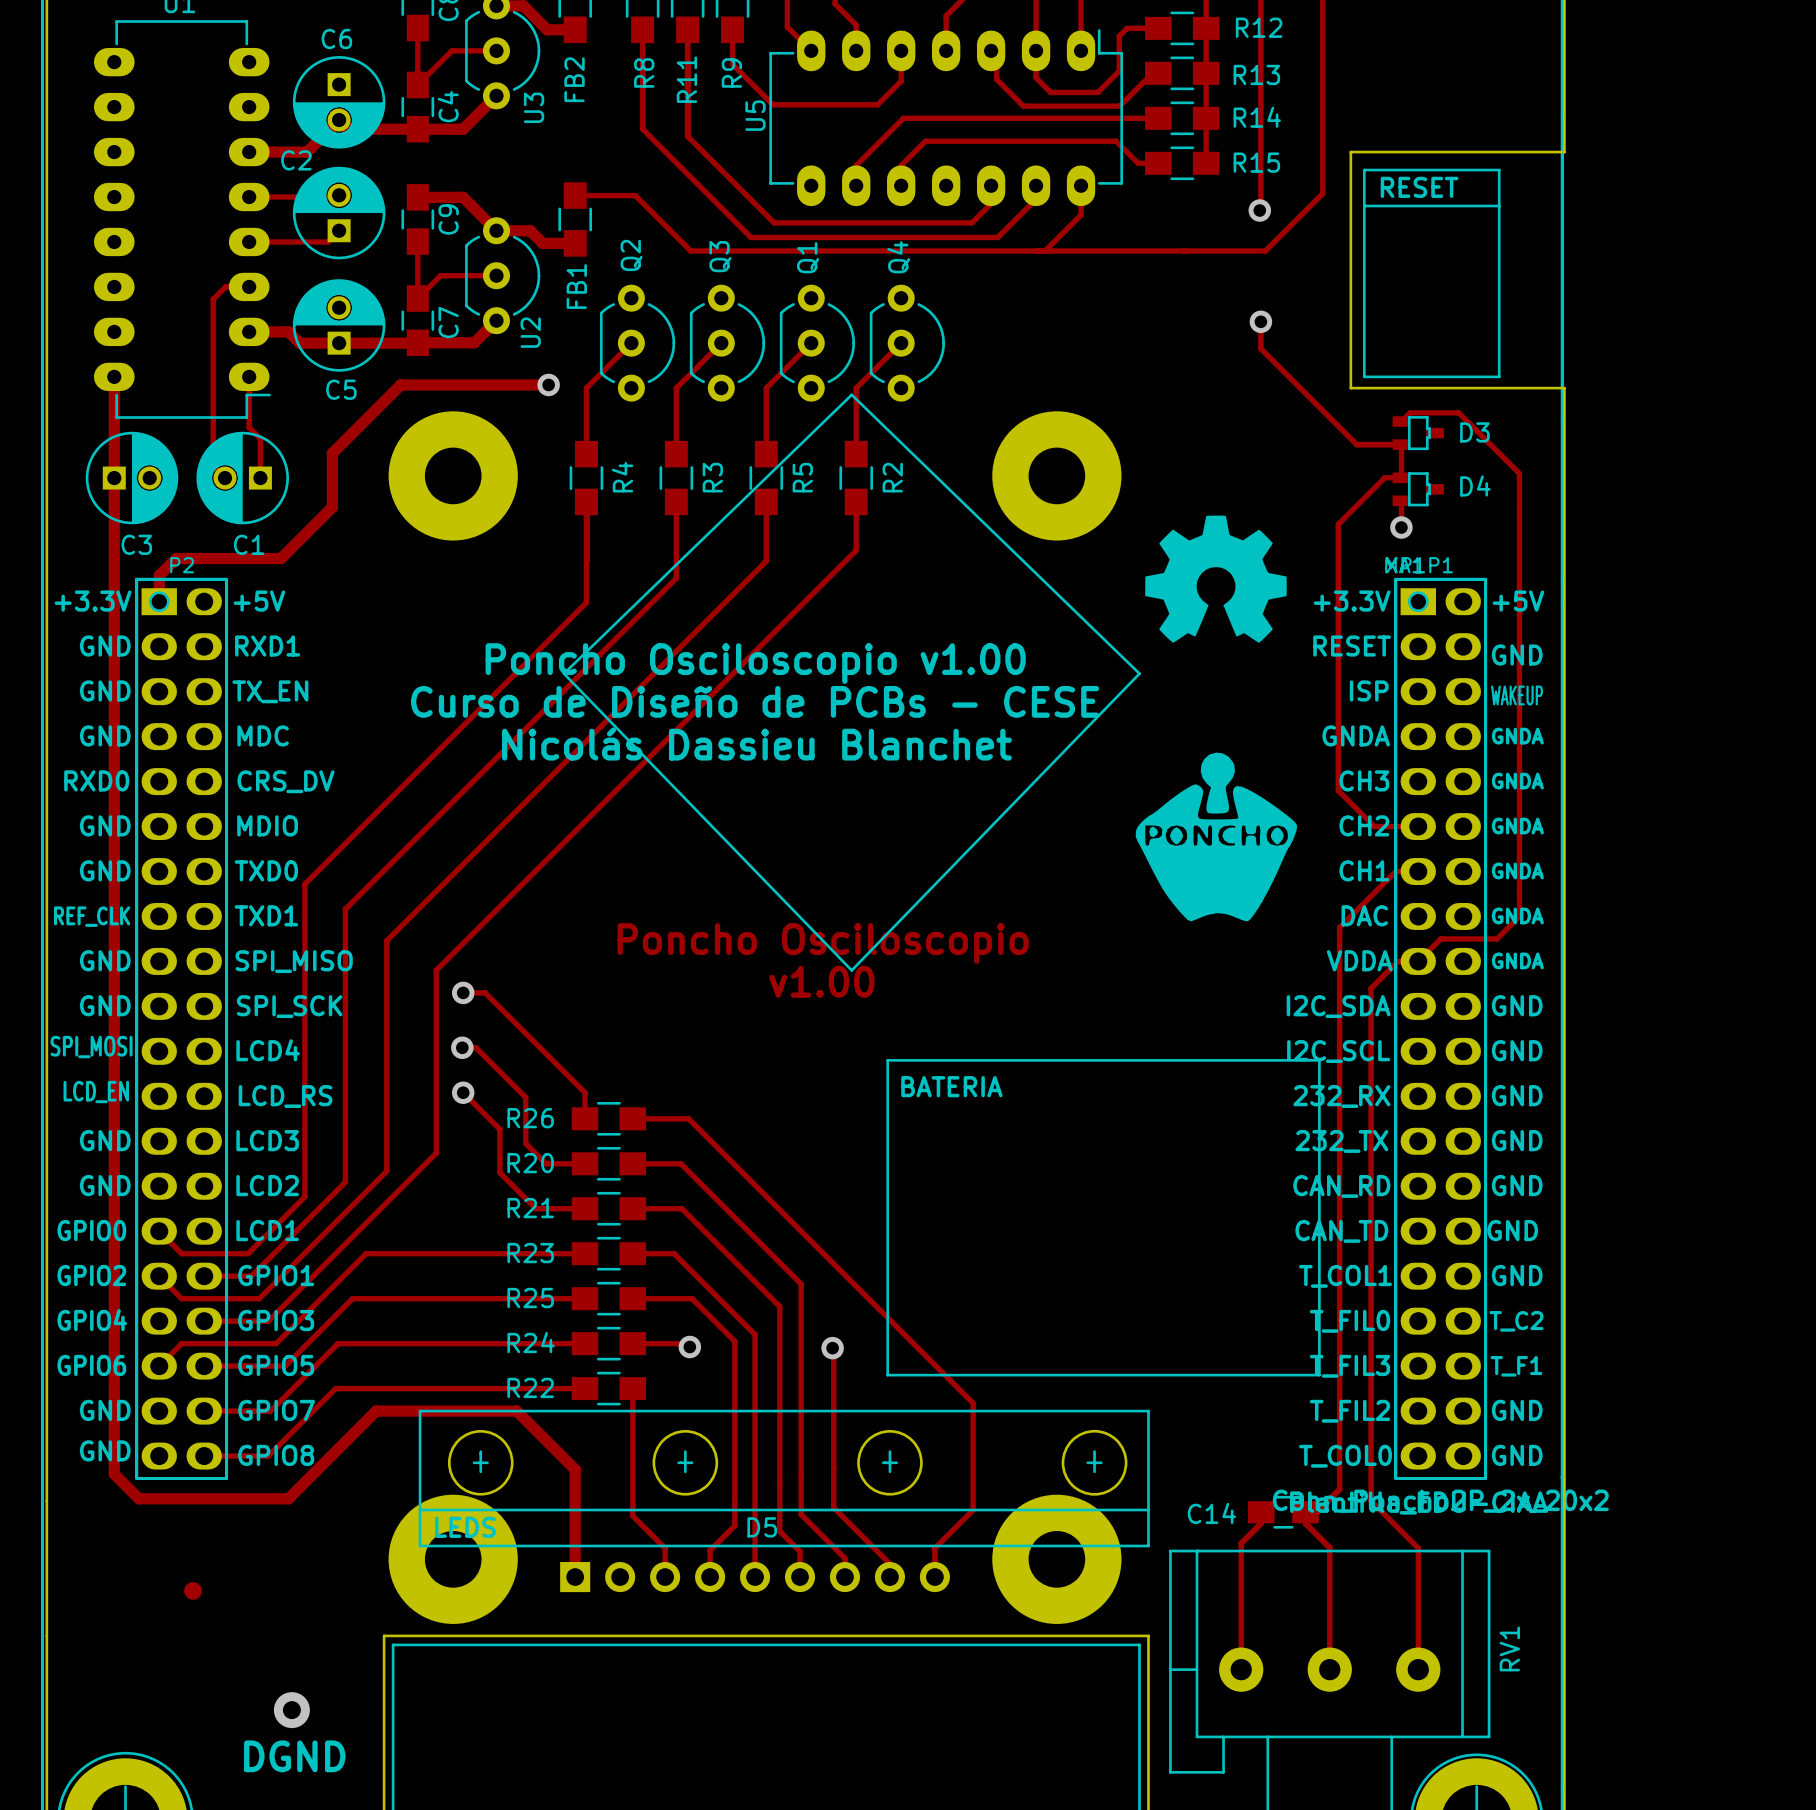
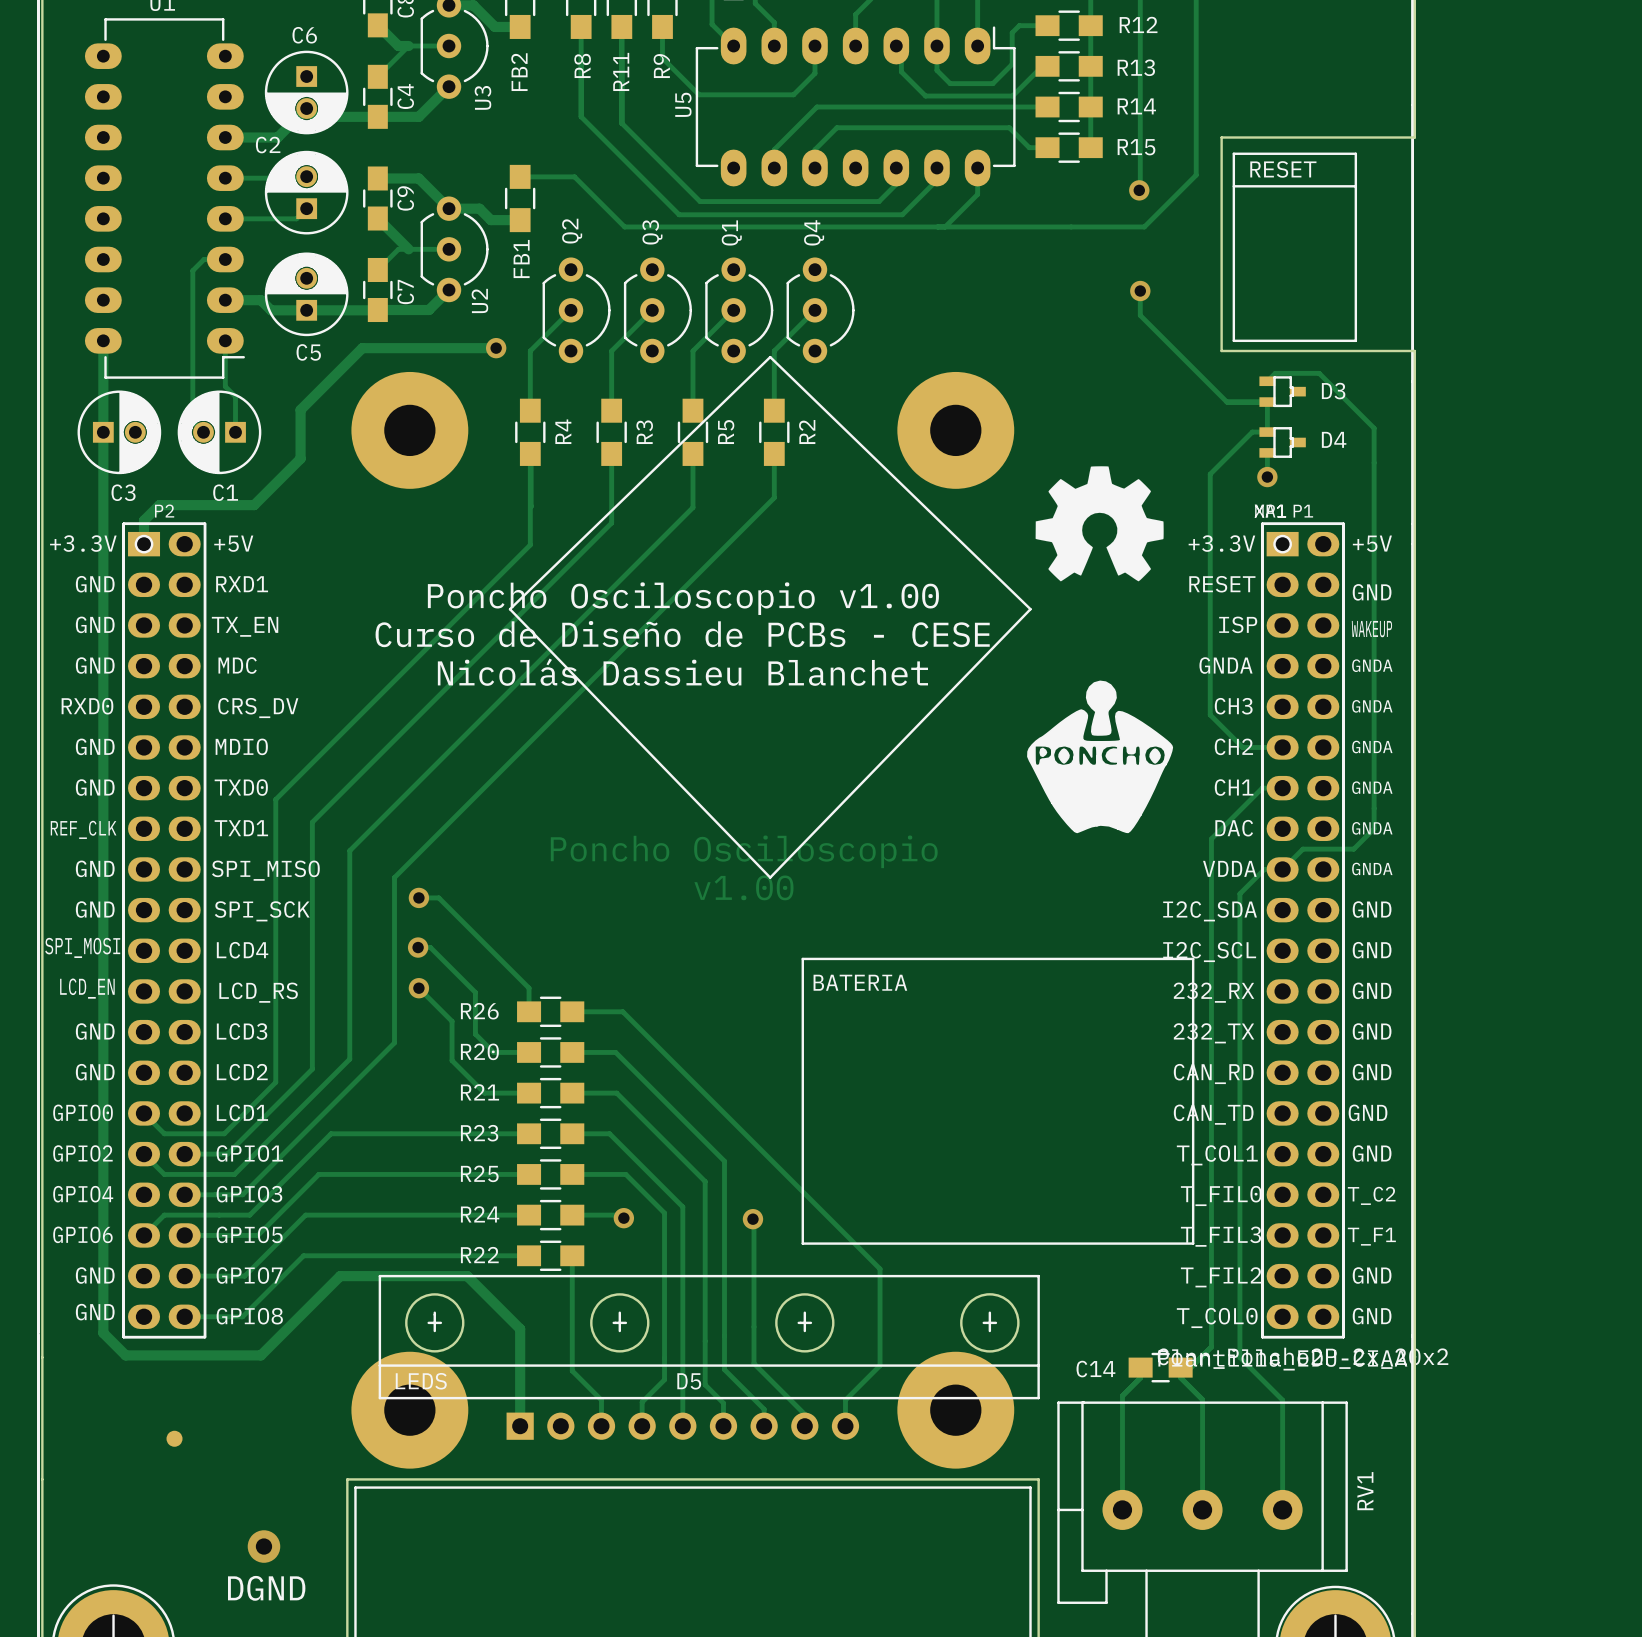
track: (417, 28) (417, 84) -> (377, 25) (398, 46) (408, 46)
track: (417, 241) (417, 298) -> (377, 218) (408, 249)

